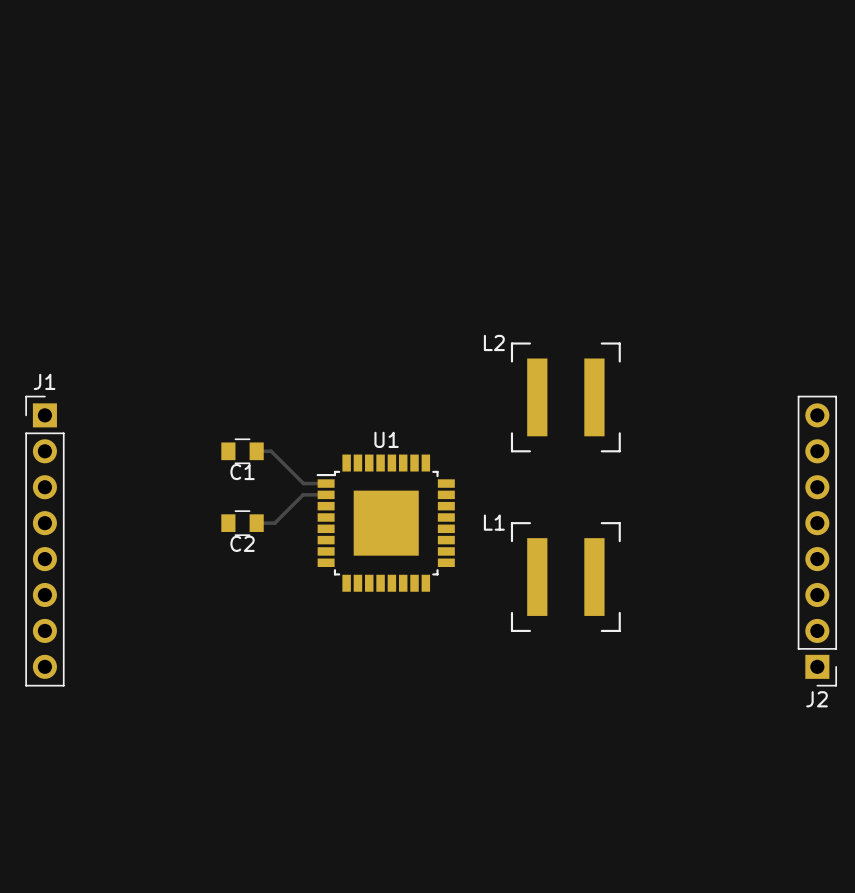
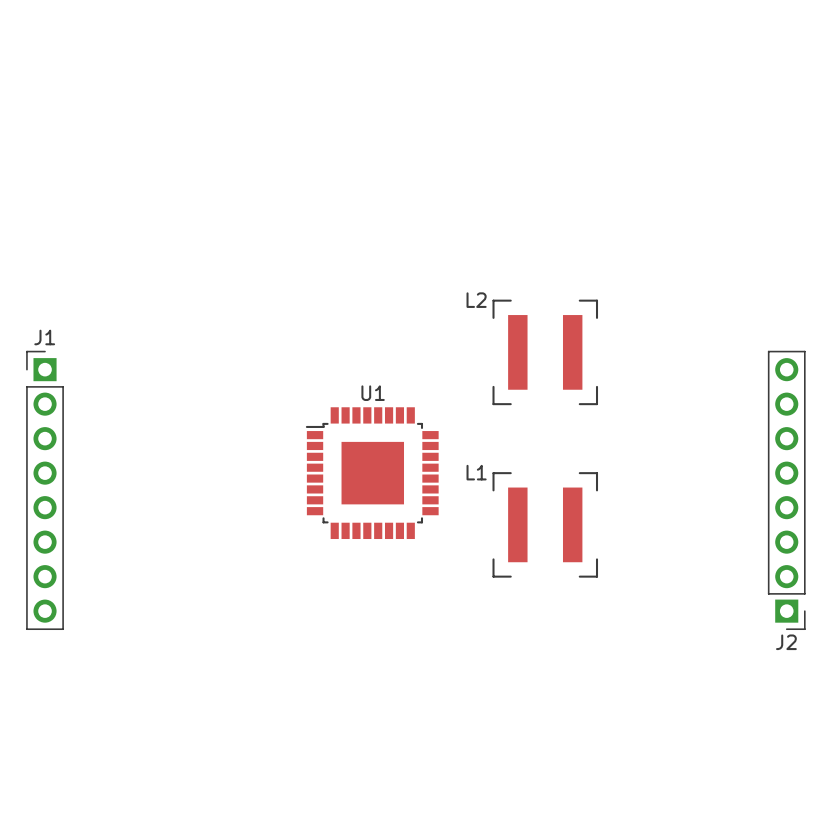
C1: (242, 451) -> none
track: (256, 451) (271, 451) (303, 483) (326, 483) -> none
track: (326, 494) (303, 494) (274, 523) (256, 523) -> none
C2: (242, 523) -> none

